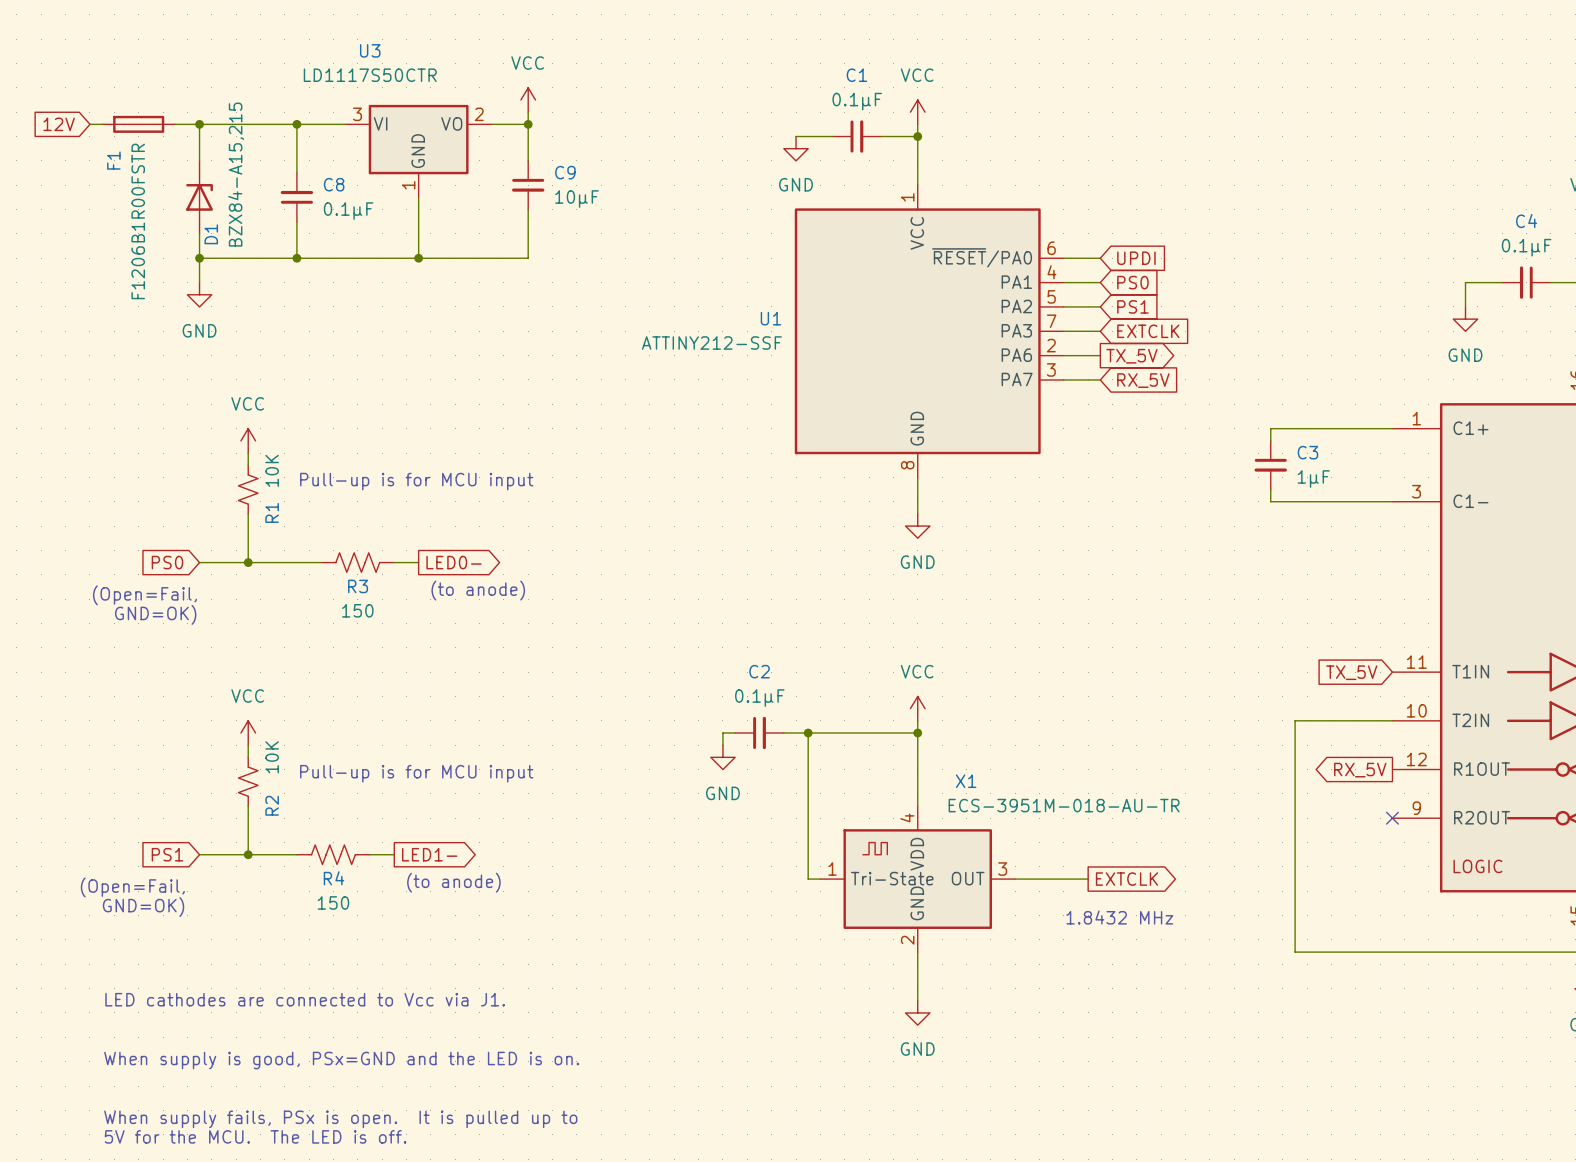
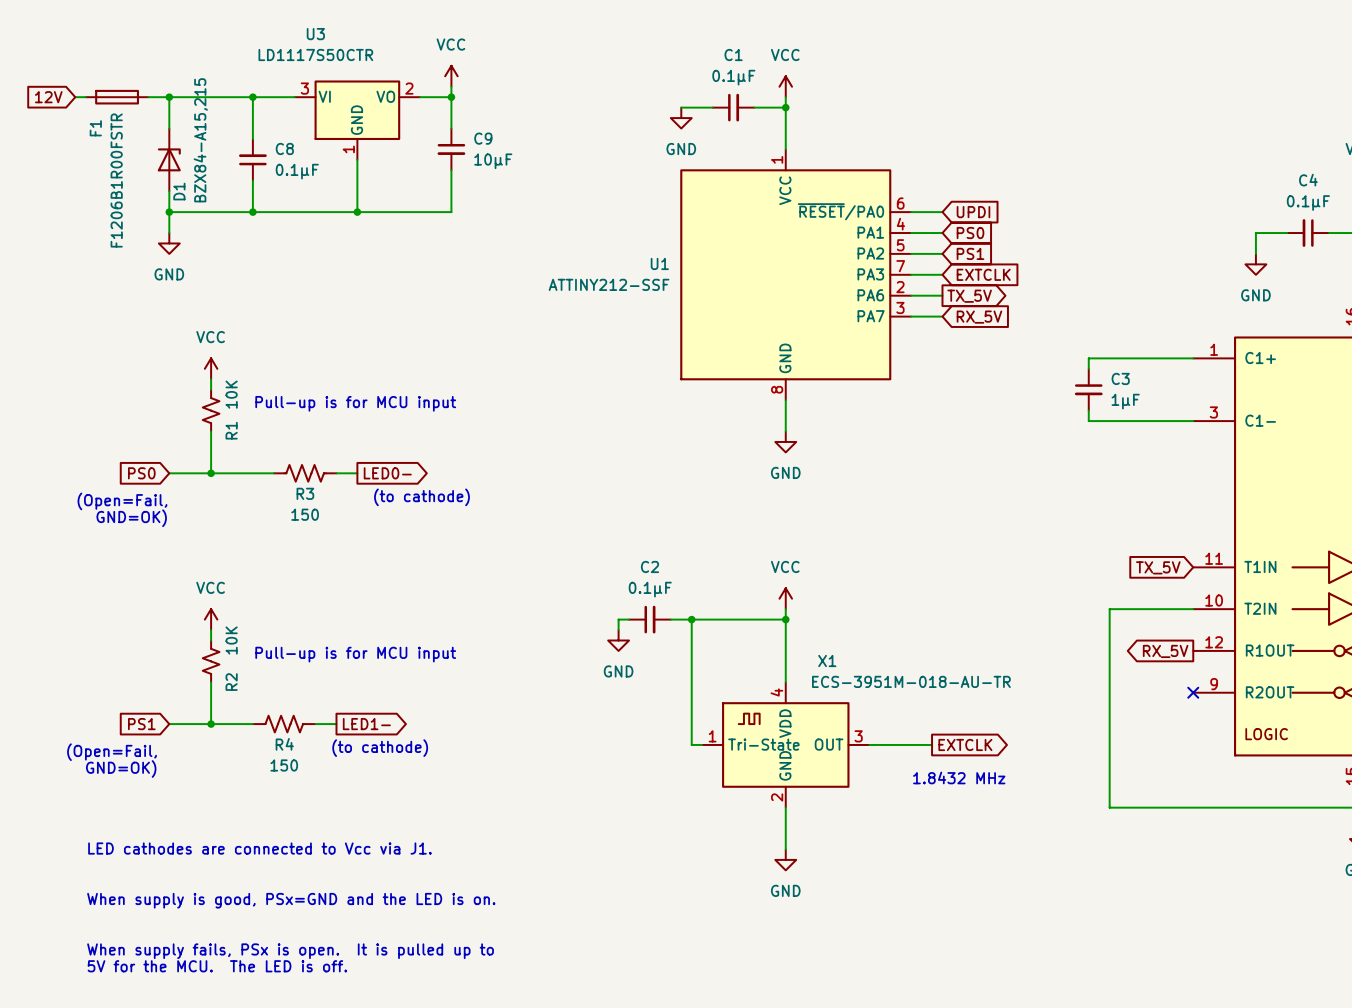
text: (to anode) (478, 590) -> (to cathode) (421, 497)
text: (to anode) (453, 882) -> (to cathode) (380, 748)

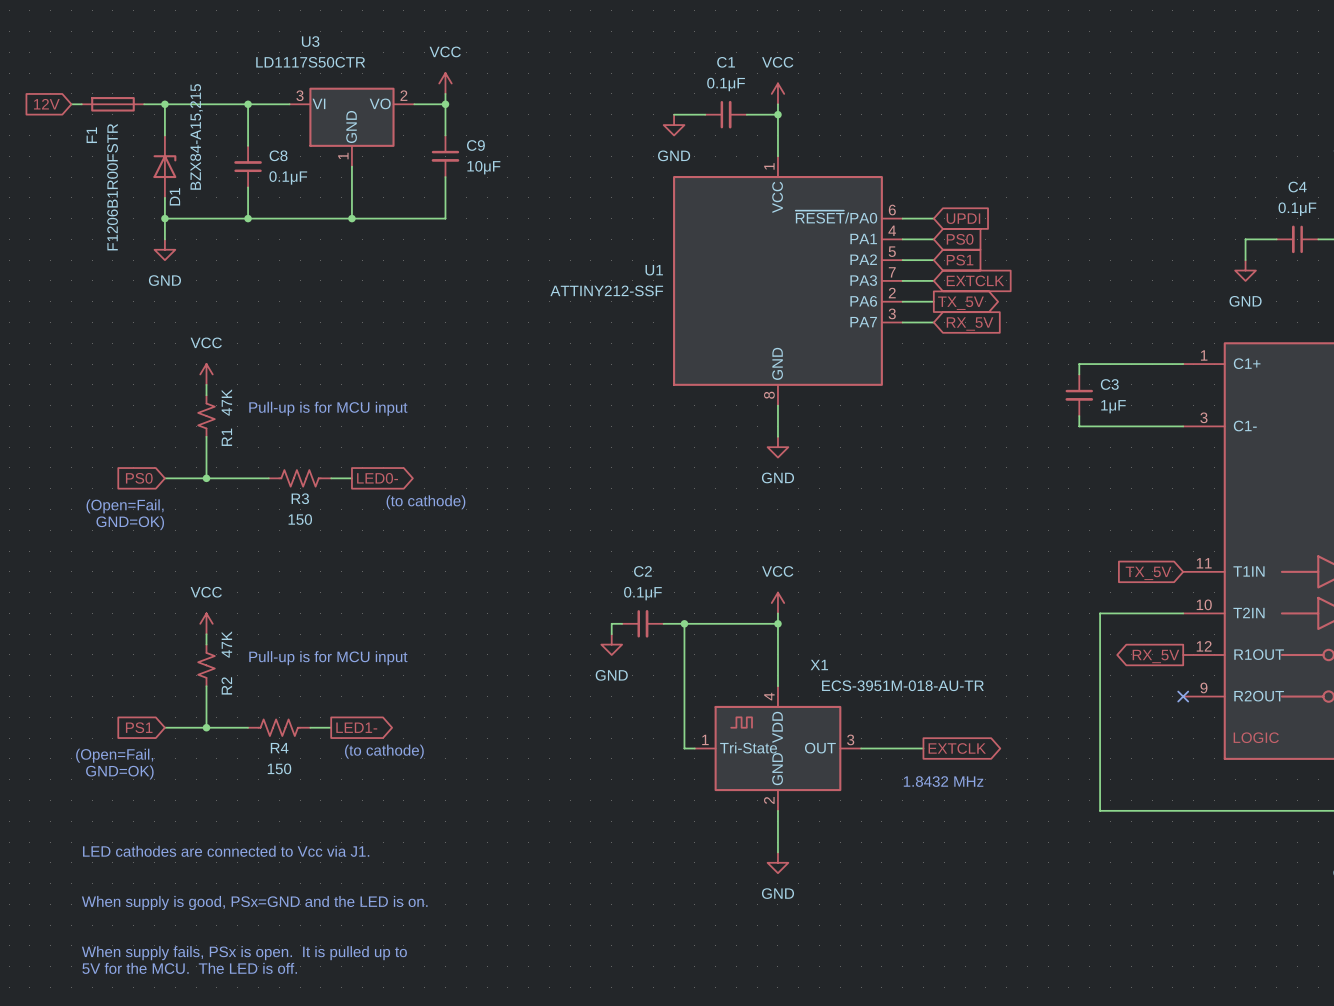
R1 value: 10K (231, 394) -> 47K (226, 402)
R2 value: 10K (231, 640) -> 47K (226, 644)

